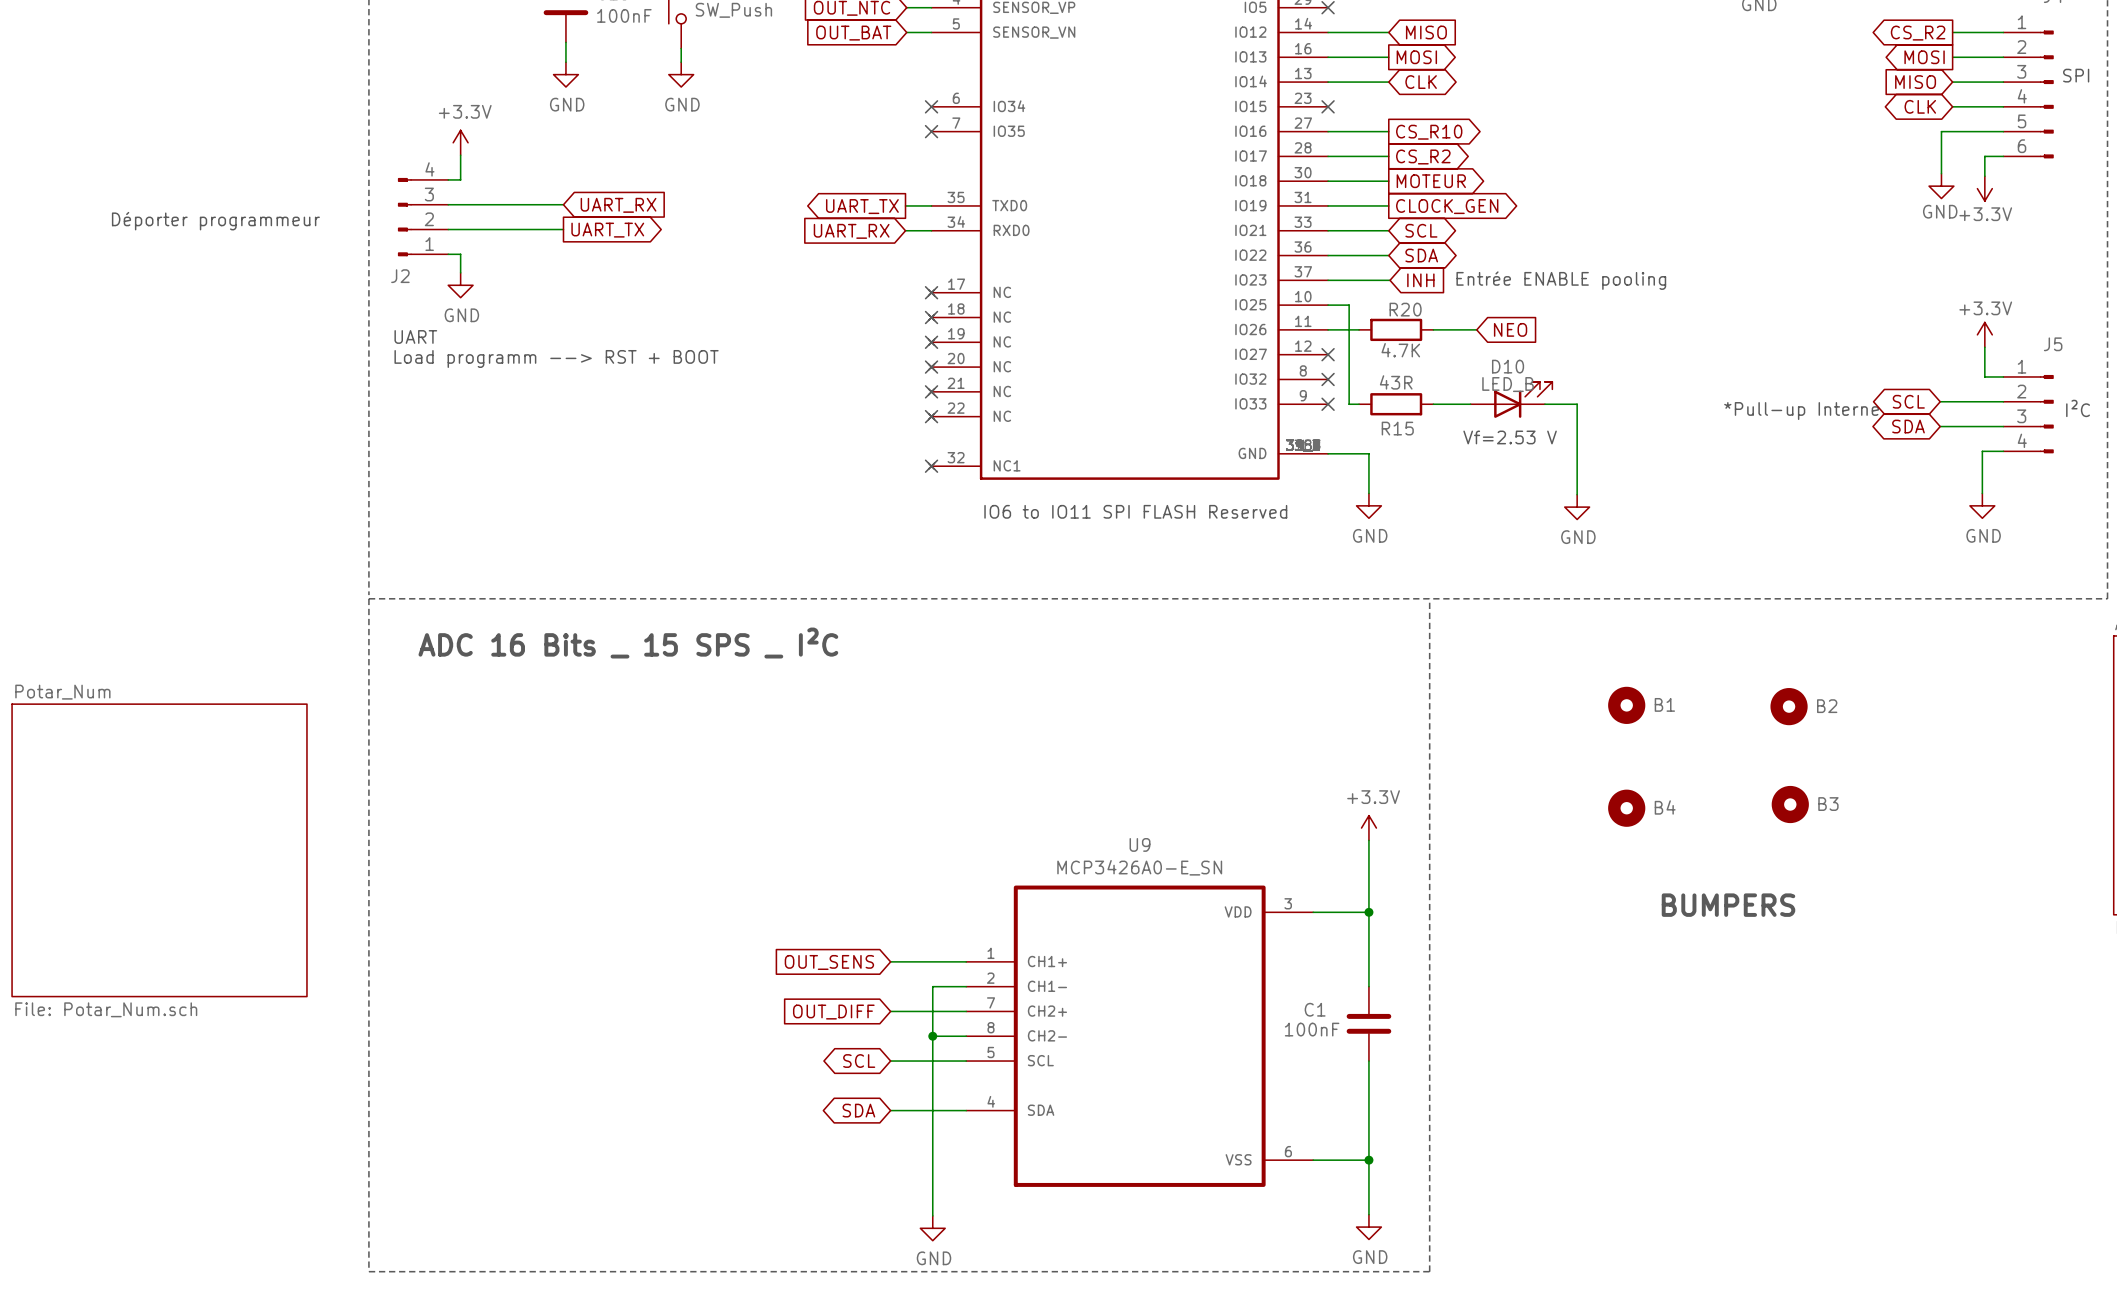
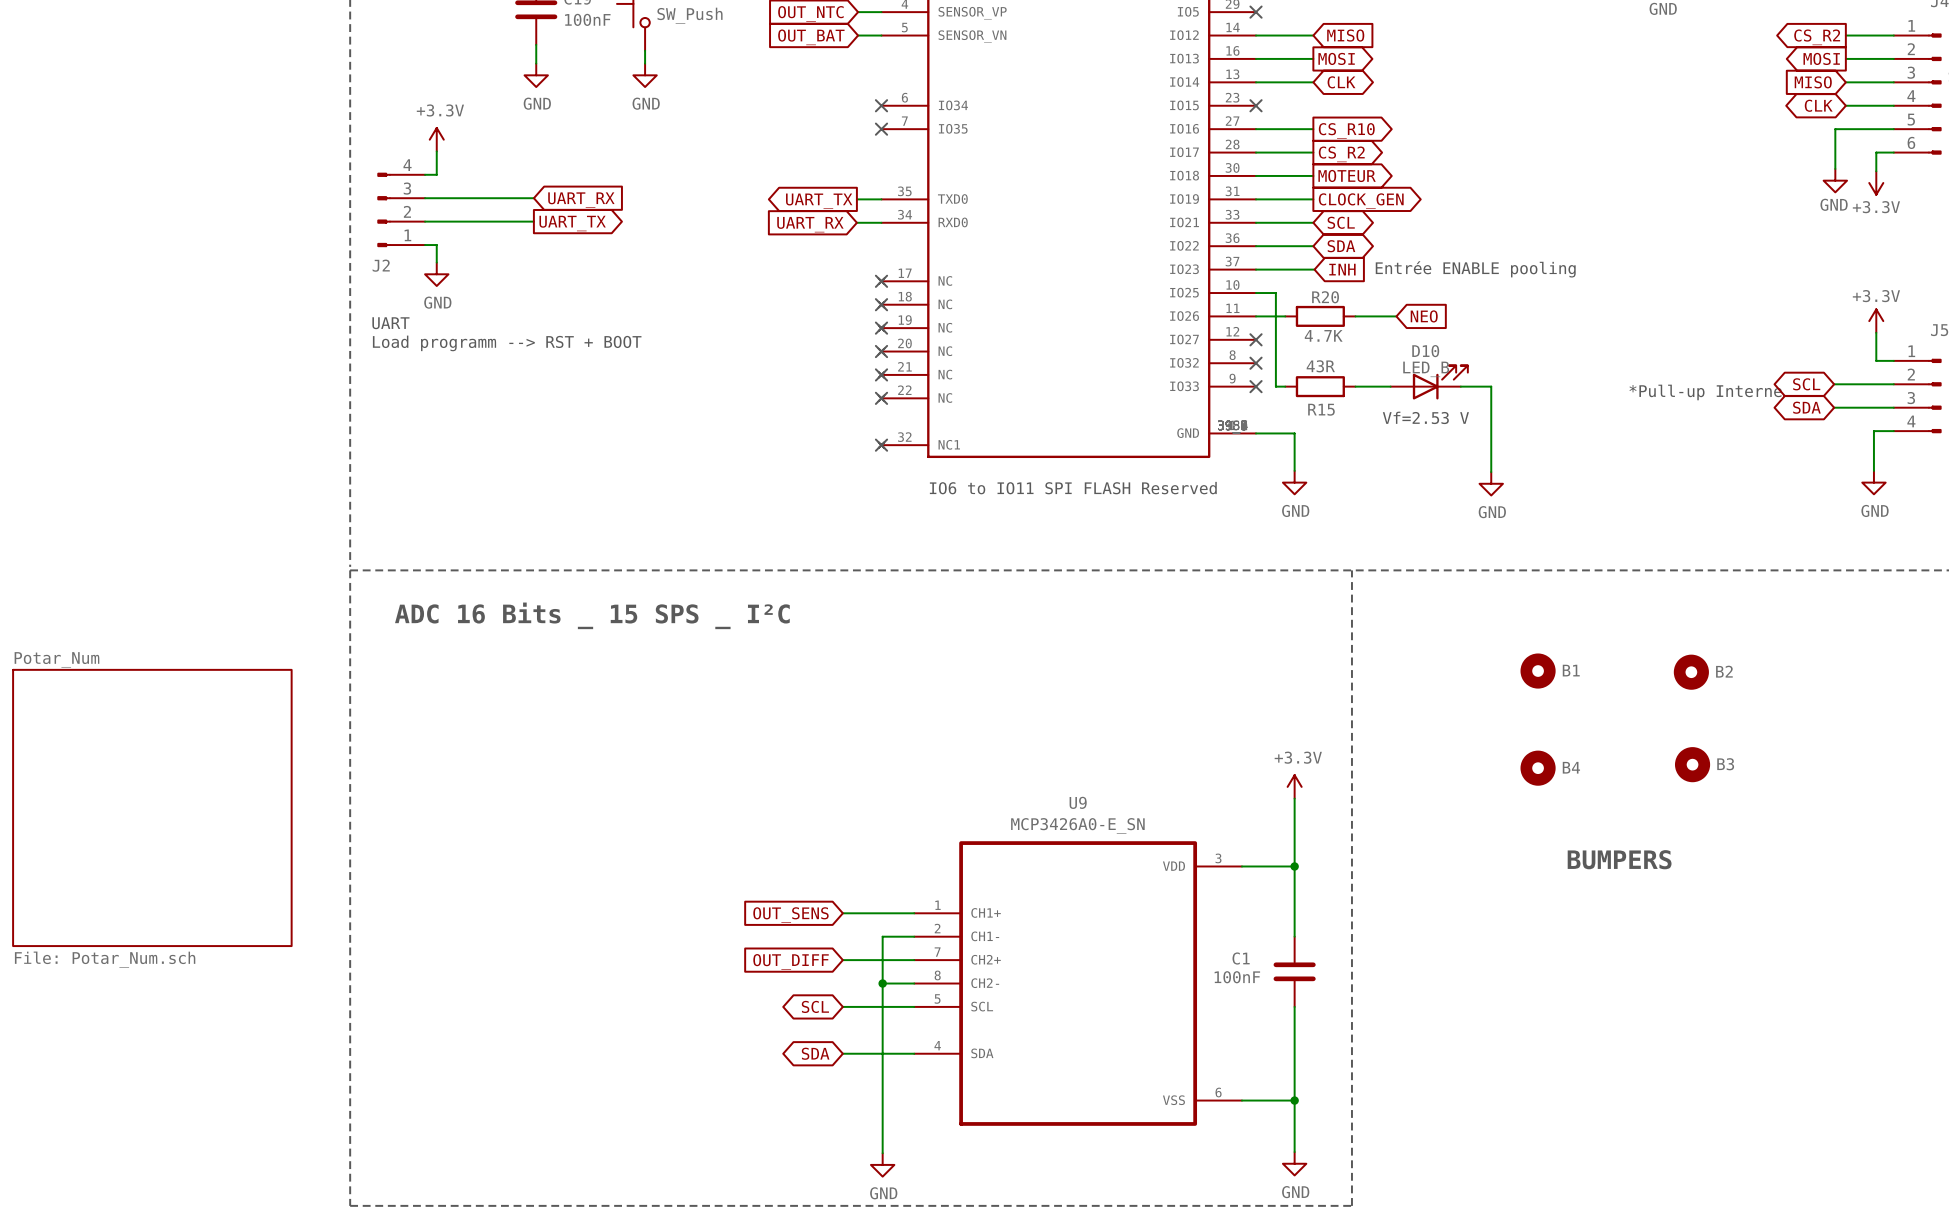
text: Déporter programmeur (215, 221) -> none

